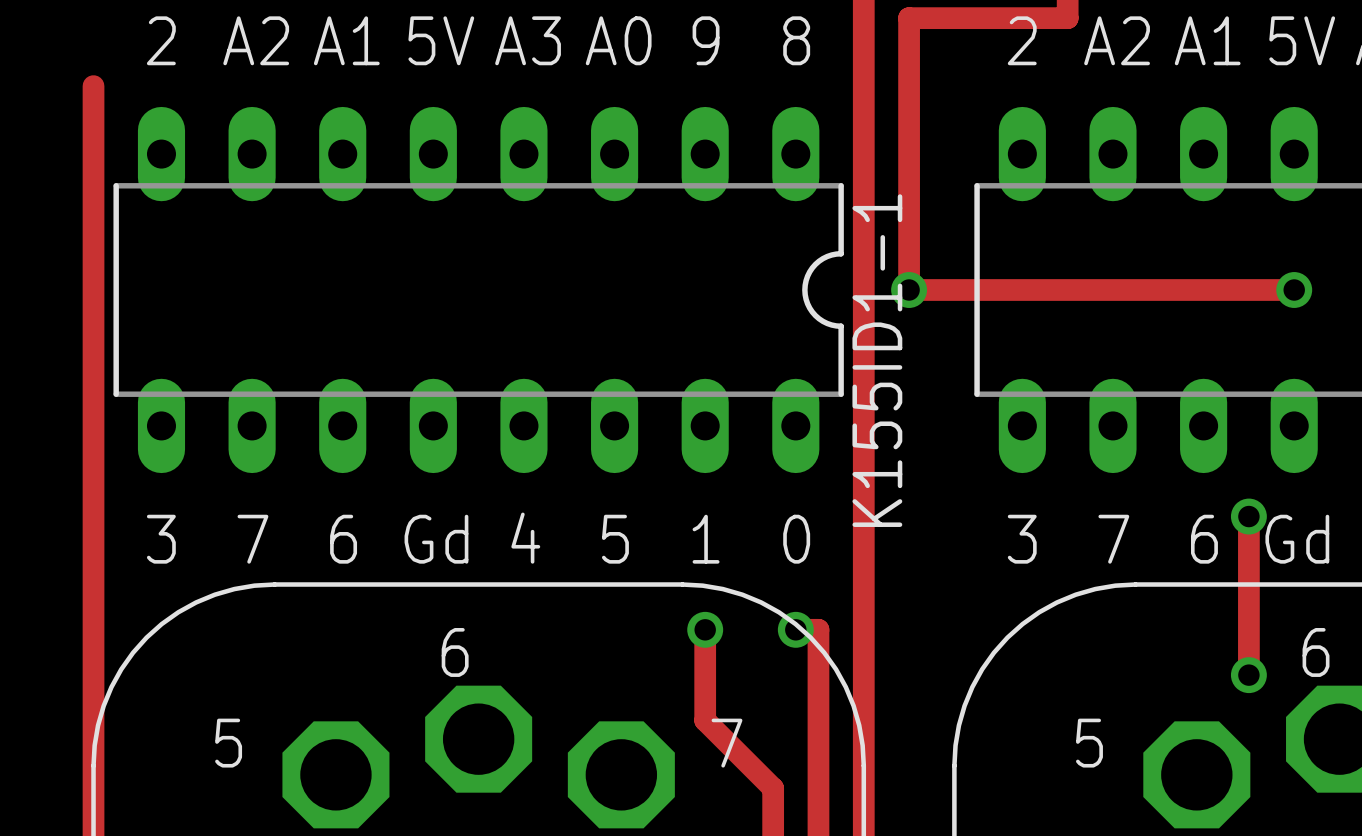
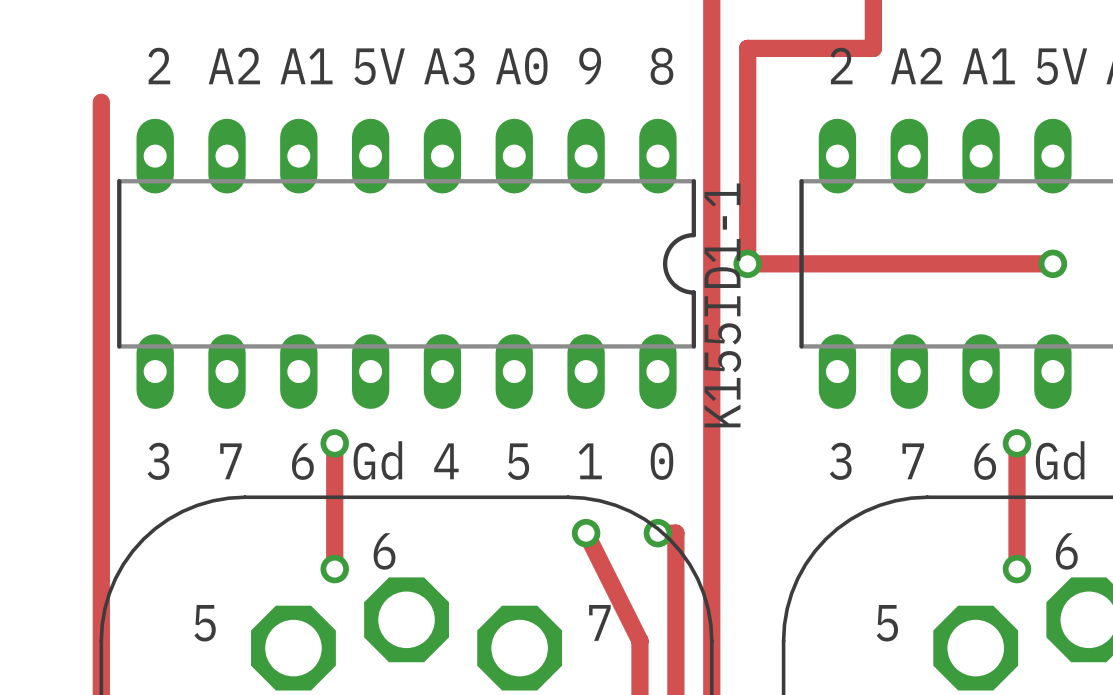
track: none -> (334, 443) (334, 569)
via: none -> (334, 443)
track: (705, 629) (705, 720) (773, 788) -> (586, 533) (639, 640) (639, 658)
via: none -> (334, 569)

